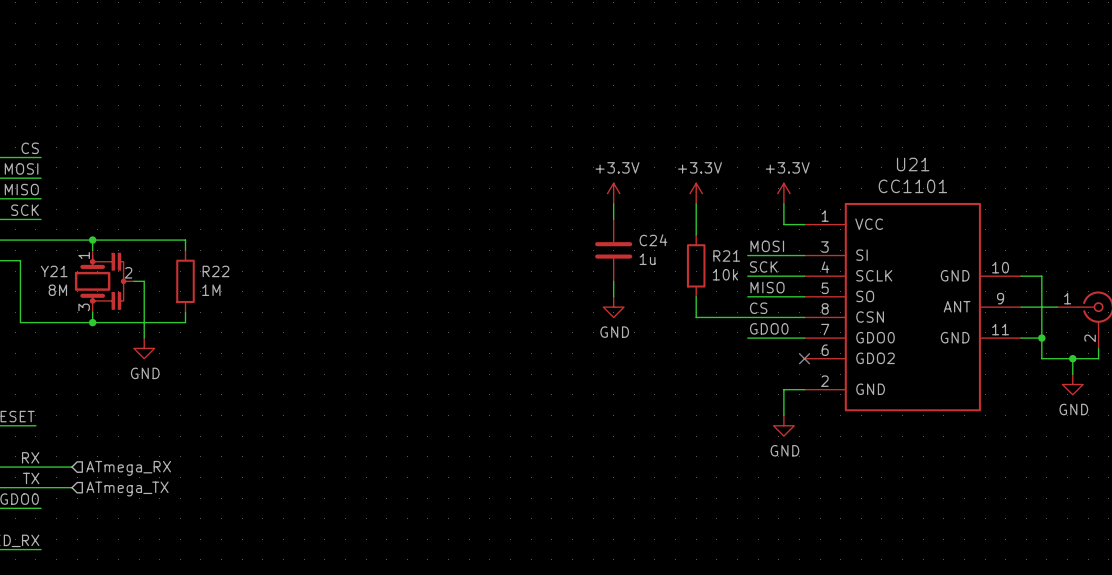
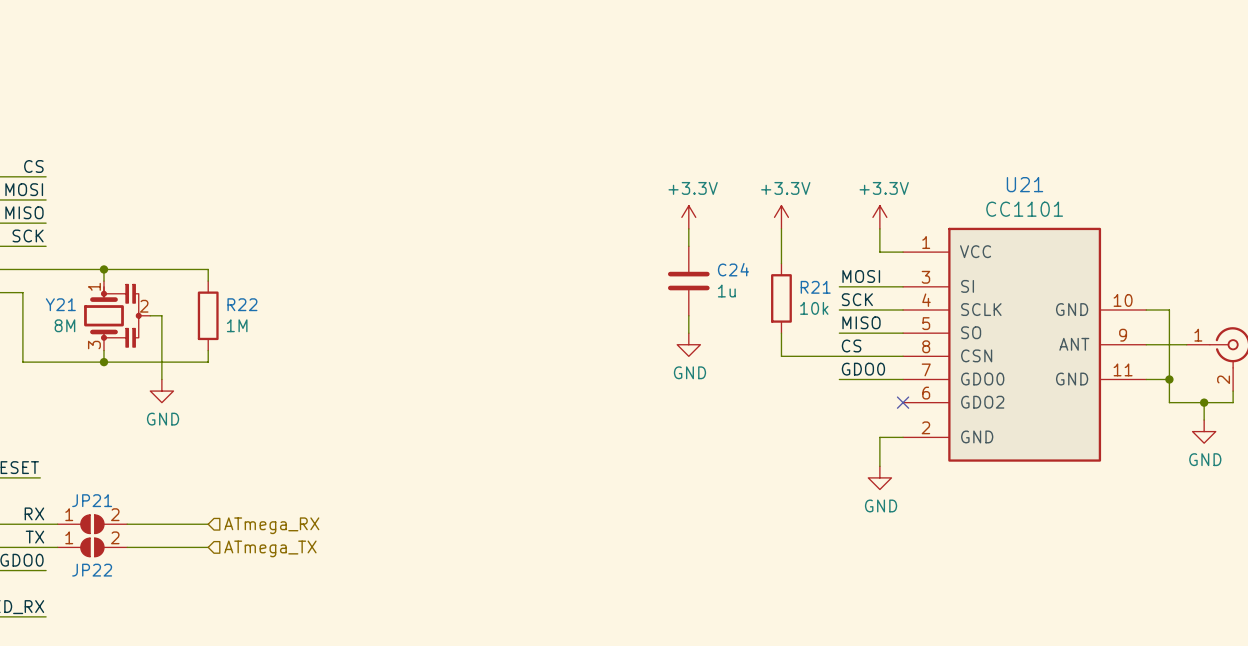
JP21: none -> (92, 524)
wire: none -> (127, 524) (208, 524)
hierarchical label position: ATmega_RX (128, 468) -> ATmega_RX (271, 525)
JP22: none -> (92, 547)
wire: none -> (127, 547) (208, 547)
hierarchical label position: ATmega_TX (127, 489) -> ATmega_TX (270, 548)

